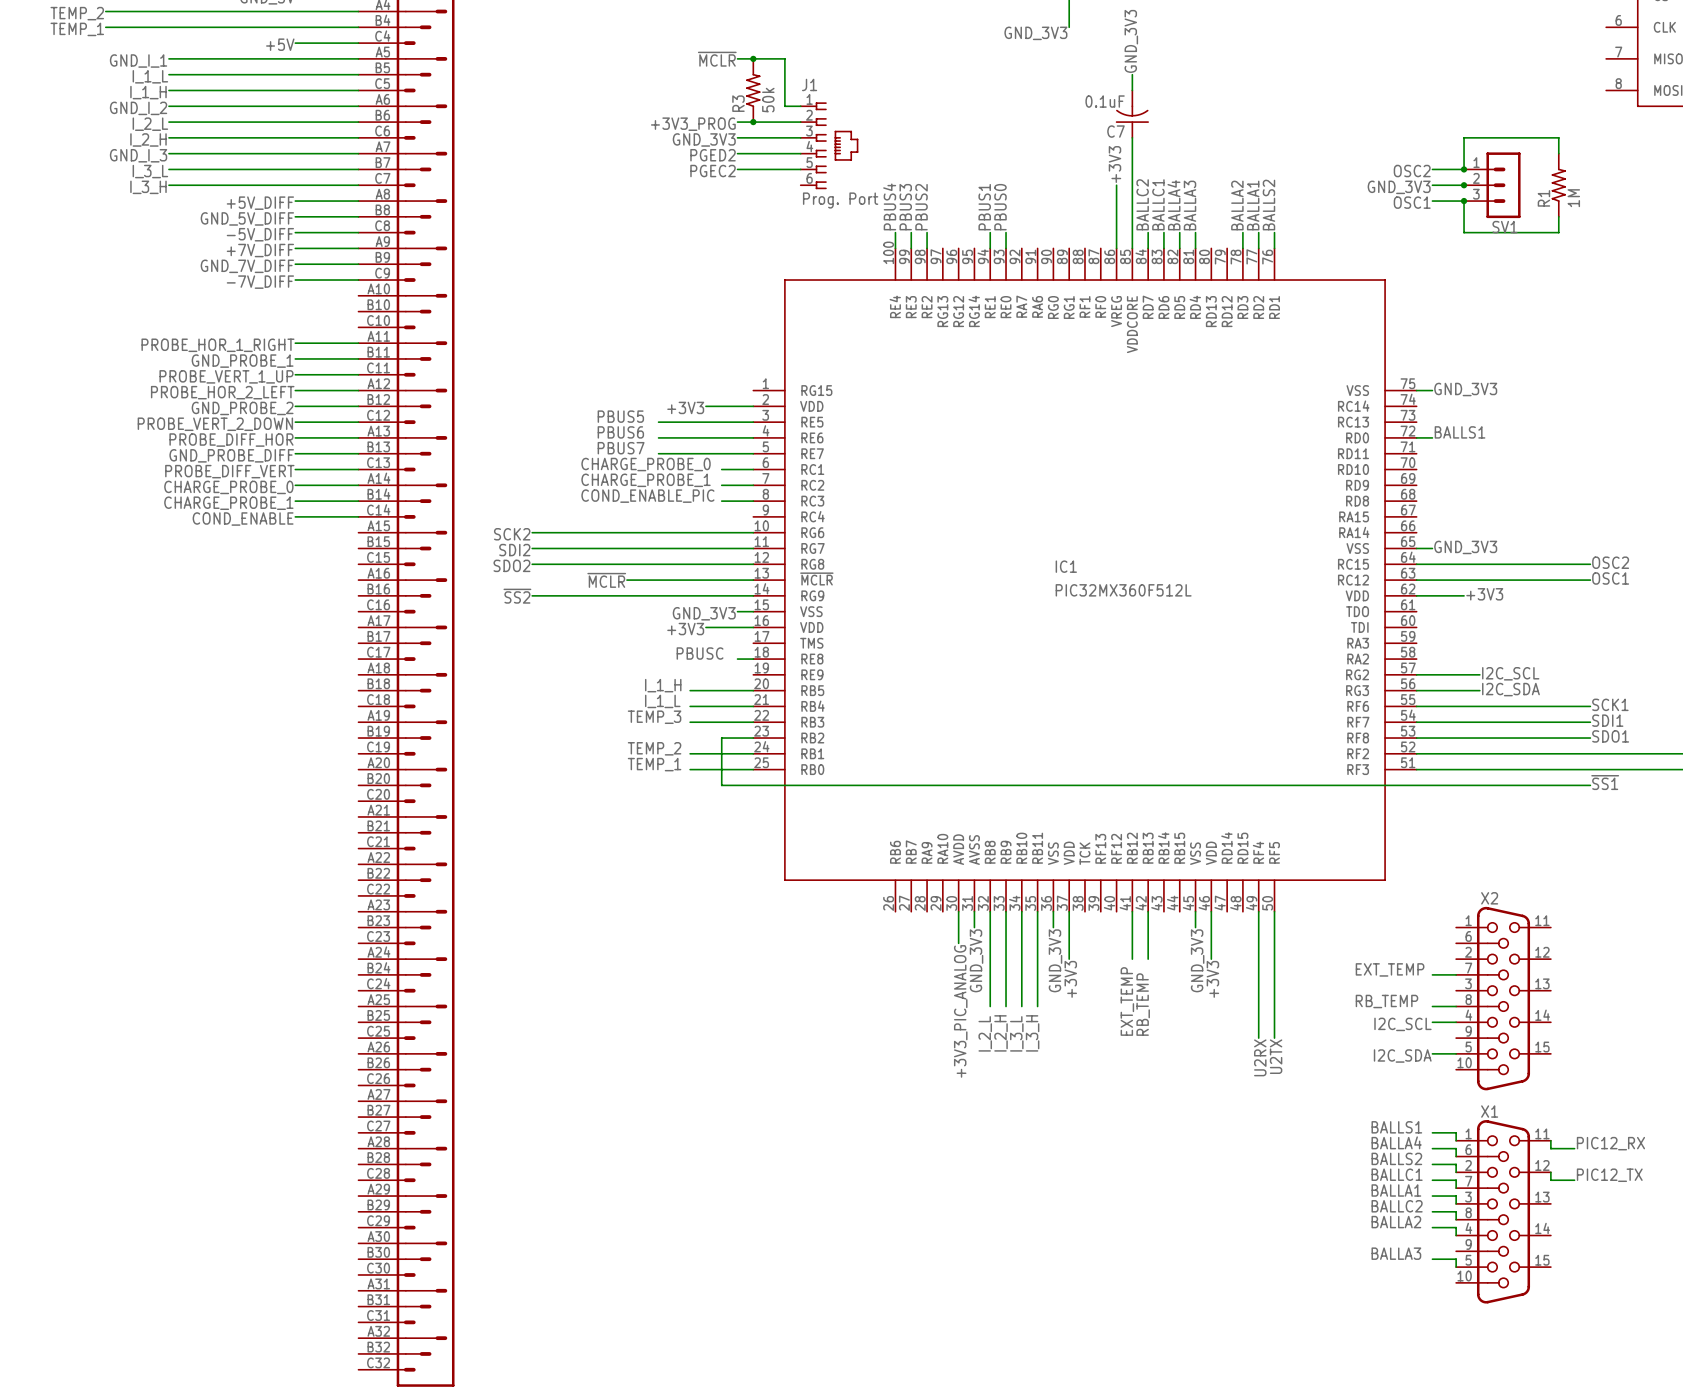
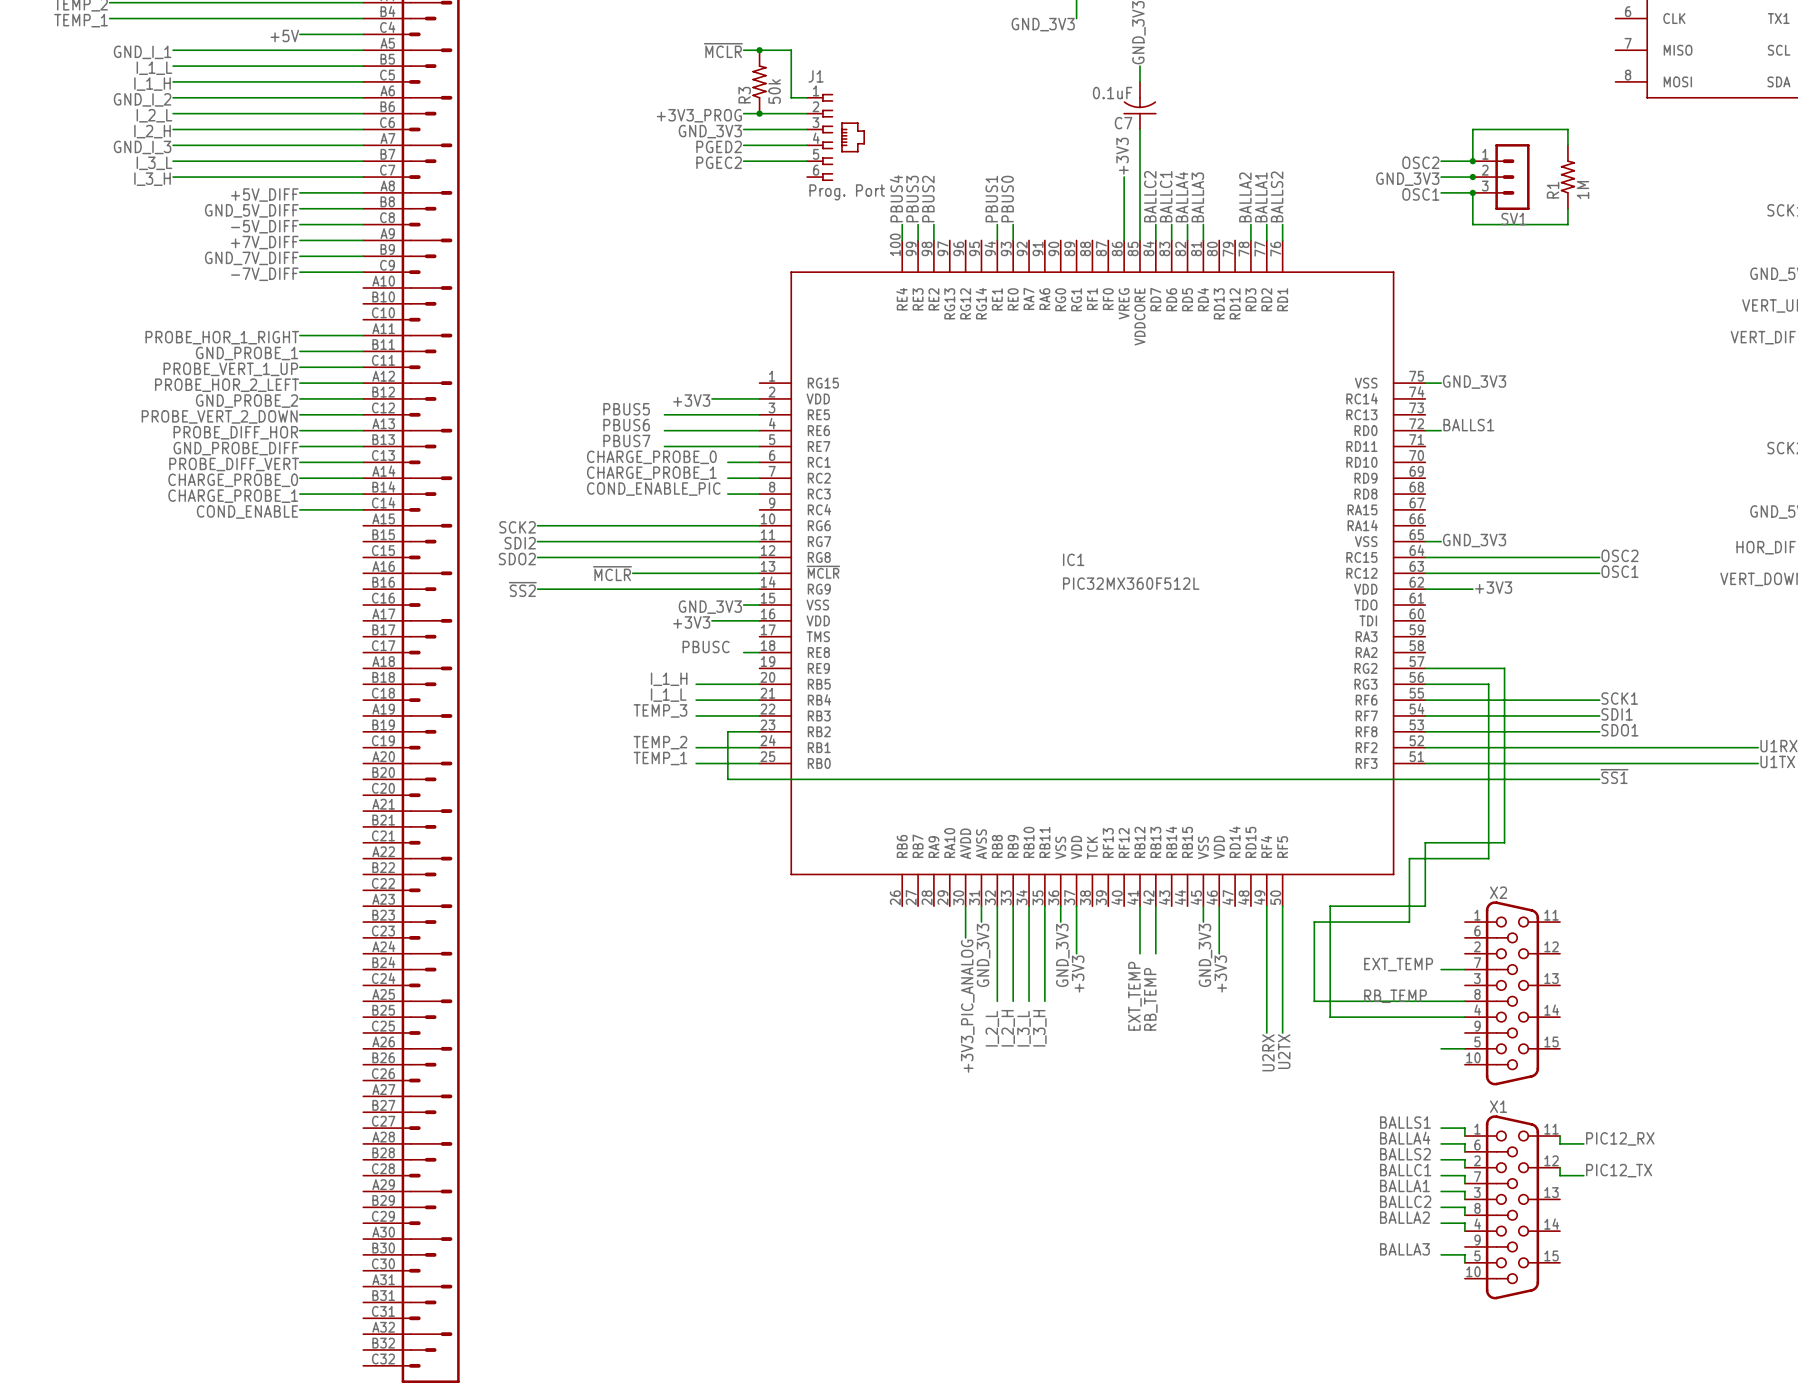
label: I2C_SCL (1510, 673) -> none
wire: none -> (1488, 668) (1504, 668) (1504, 842) (1425, 842) (1425, 906) (1330, 906) (1330, 1017) (1441, 1017)
label: I2C_SDA (1510, 689) -> none
wire: none -> (1488, 684) (1488, 858) (1409, 858) (1409, 922) (1314, 922) (1314, 1001) (1441, 1001)
label: I2C_SCL (1402, 1024) -> none
label: I2C_SDA (1402, 1055) -> none

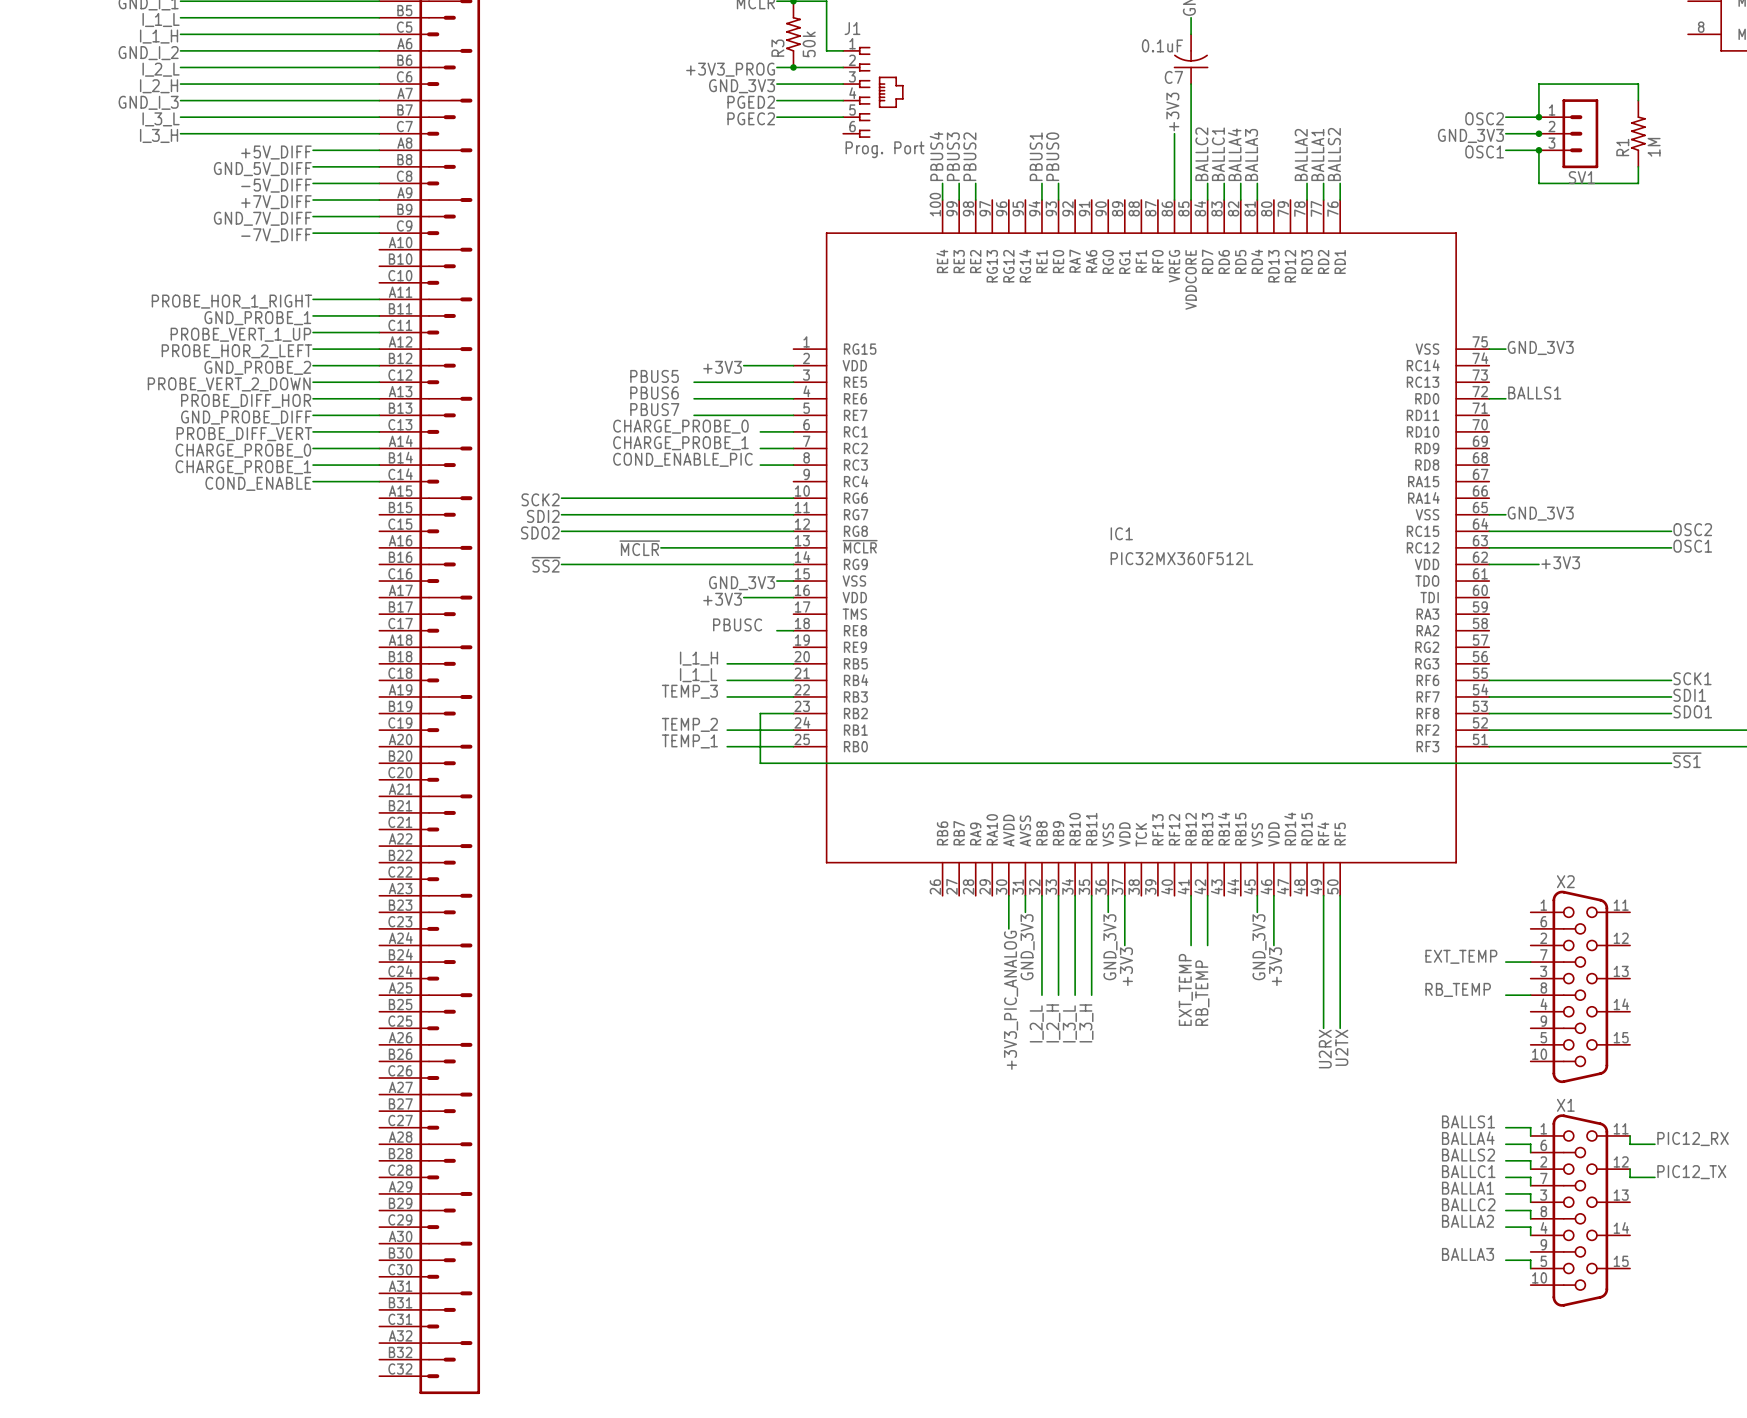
wire: (1425, 668) (1504, 668) (1504, 842) (1425, 842) (1425, 906) (1330, 906) (1330, 1017) (1464, 1017) -> none
wire: (1425, 684) (1488, 684) (1488, 858) (1409, 858) (1409, 922) (1314, 922) (1314, 1001) (1441, 1001) -> none
wire: (1441, 1048) (1464, 1048) -> none

